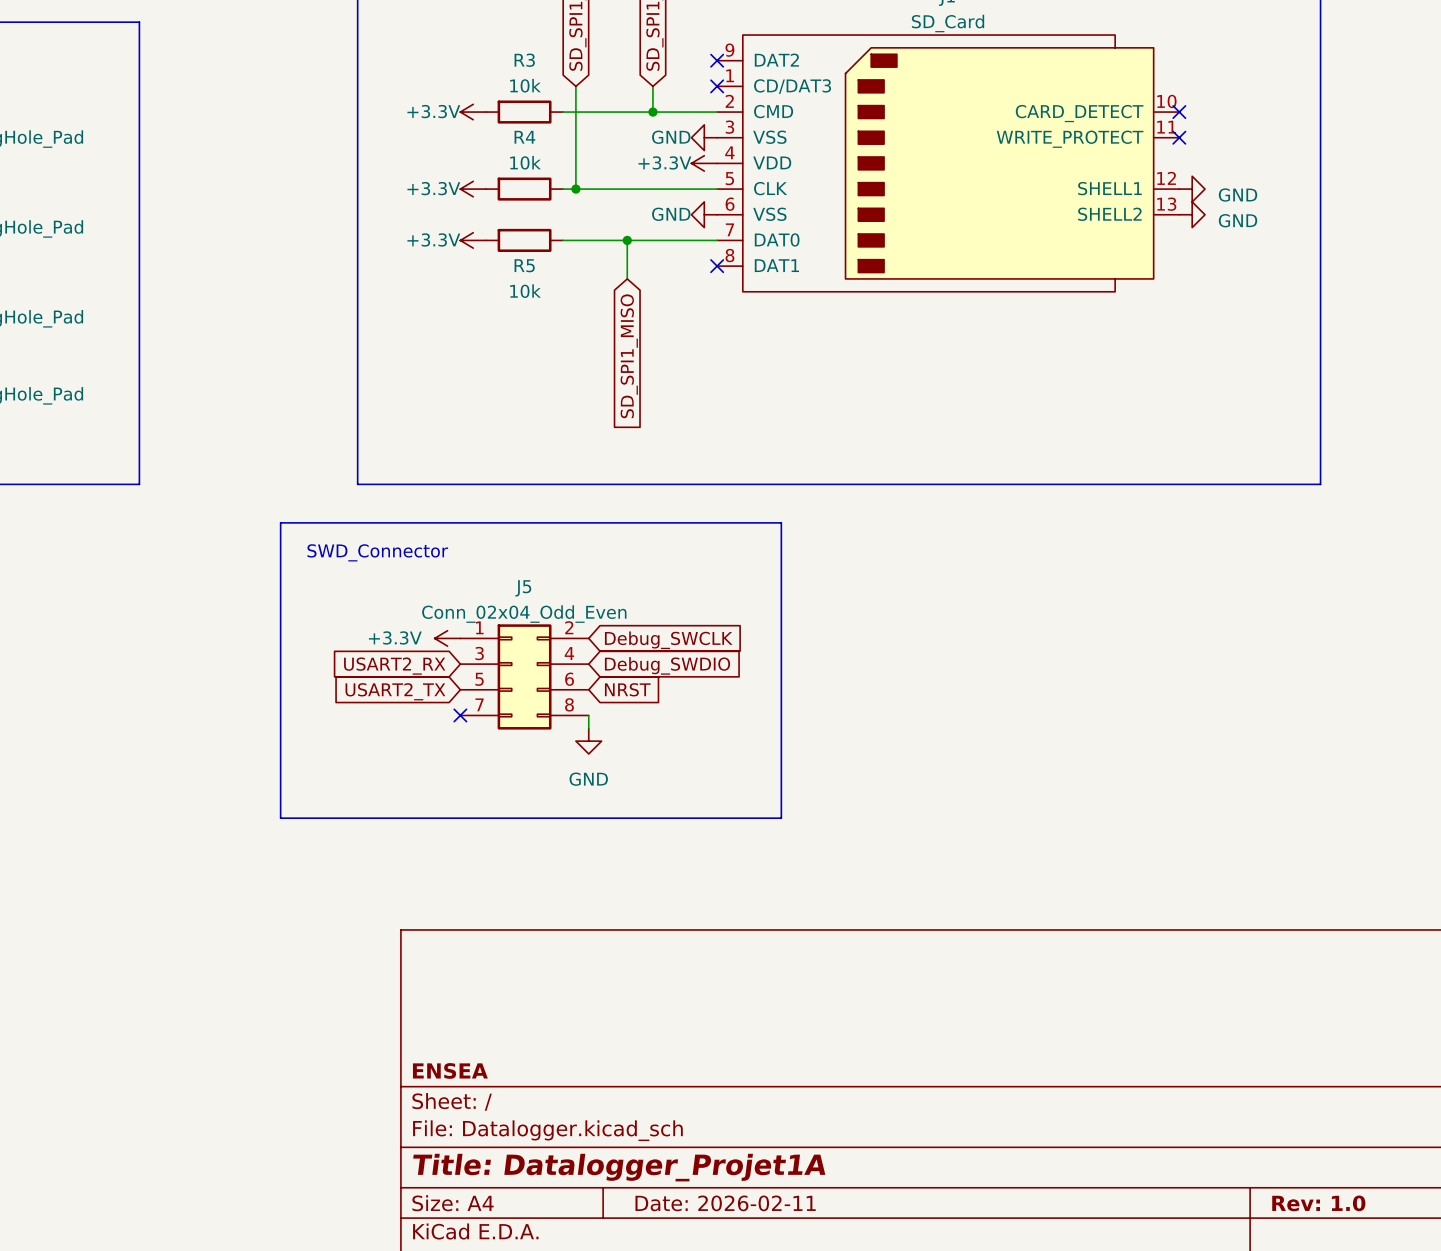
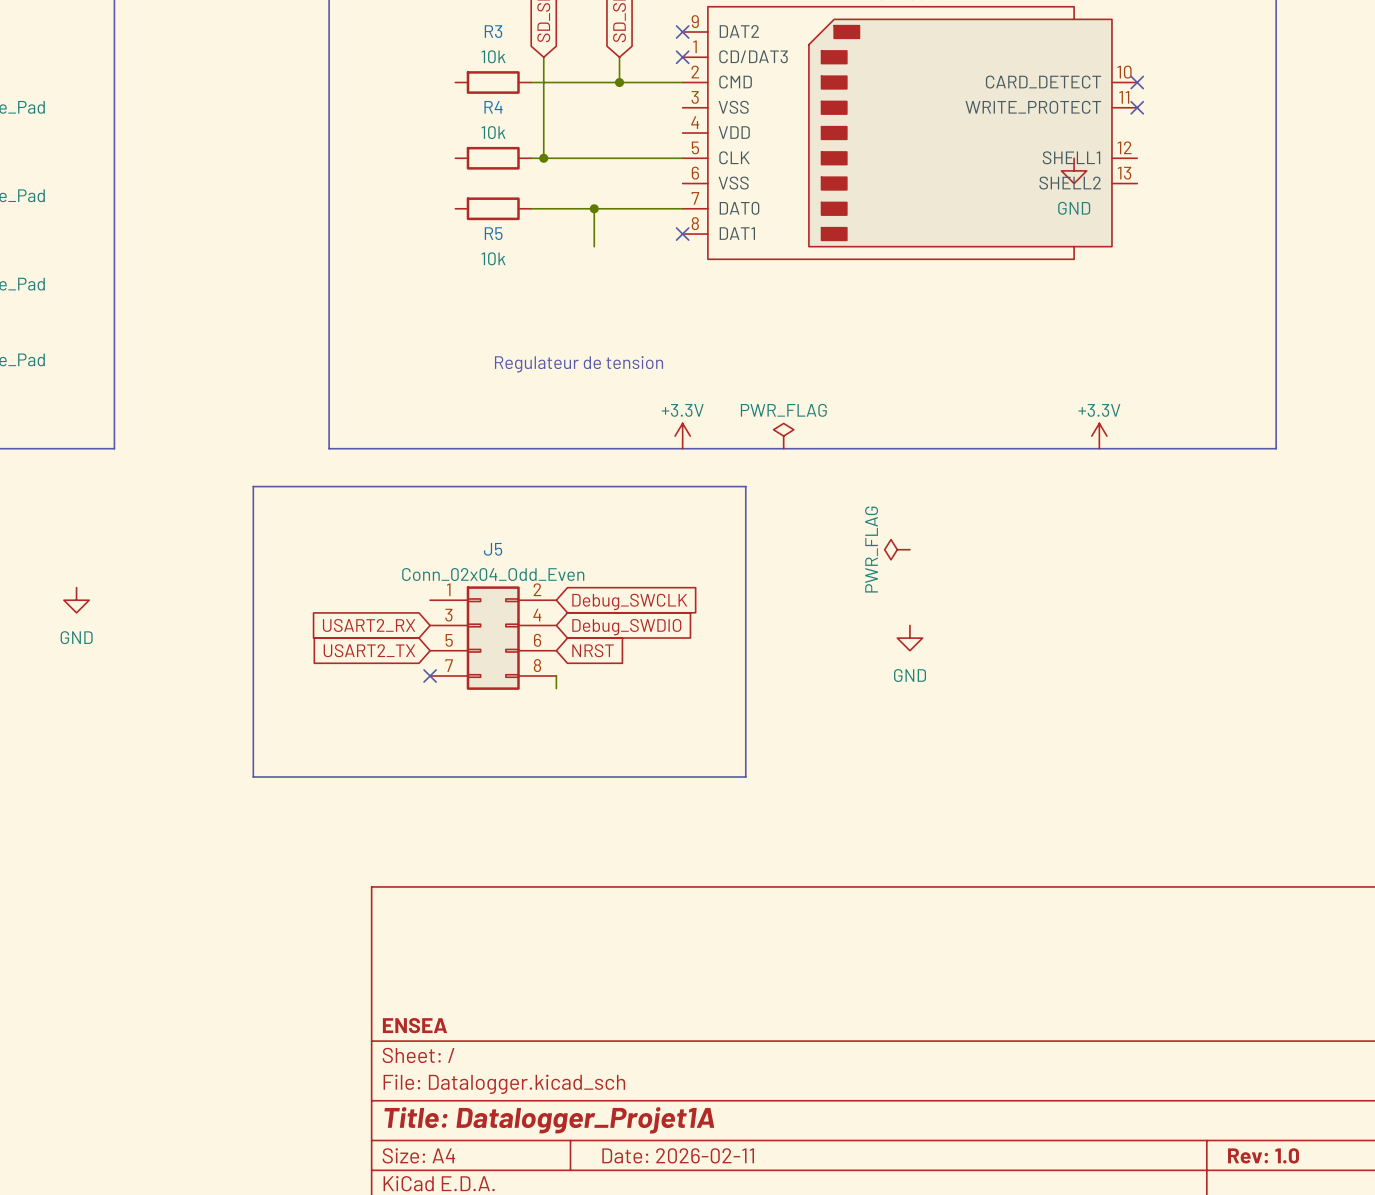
power symbol: +3.3V (473, 112) -> none
power symbol: GND (704, 137) -> none
power symbol: +3.3V (704, 163) -> none
power symbol: +3.3V (473, 189) -> none
power symbol: GND (1192, 189) -> none
power symbol: none -> GND (1074, 170)
power symbol: GND (704, 214) -> none
power symbol: GND (1192, 214) -> none
power symbol: +3.3V (473, 240) -> none
global label: SD_SPI1_MISO (629, 356) -> none
text: none -> Regulateur de tension (579, 364)
power symbol: none -> +3.3V (682, 436)
power symbol: none -> PWR_FLAG (783, 436)
power symbol: none -> +3.3V (1099, 436)
text: SWD_Connector (377, 552) -> none
power symbol: none -> PWR_FLAG (897, 549)
power symbol: none -> GND (76, 600)
power symbol: +3.3V (447, 638) -> none
power symbol: none -> GND (909, 638)
power symbol: GND (588, 741) -> none

